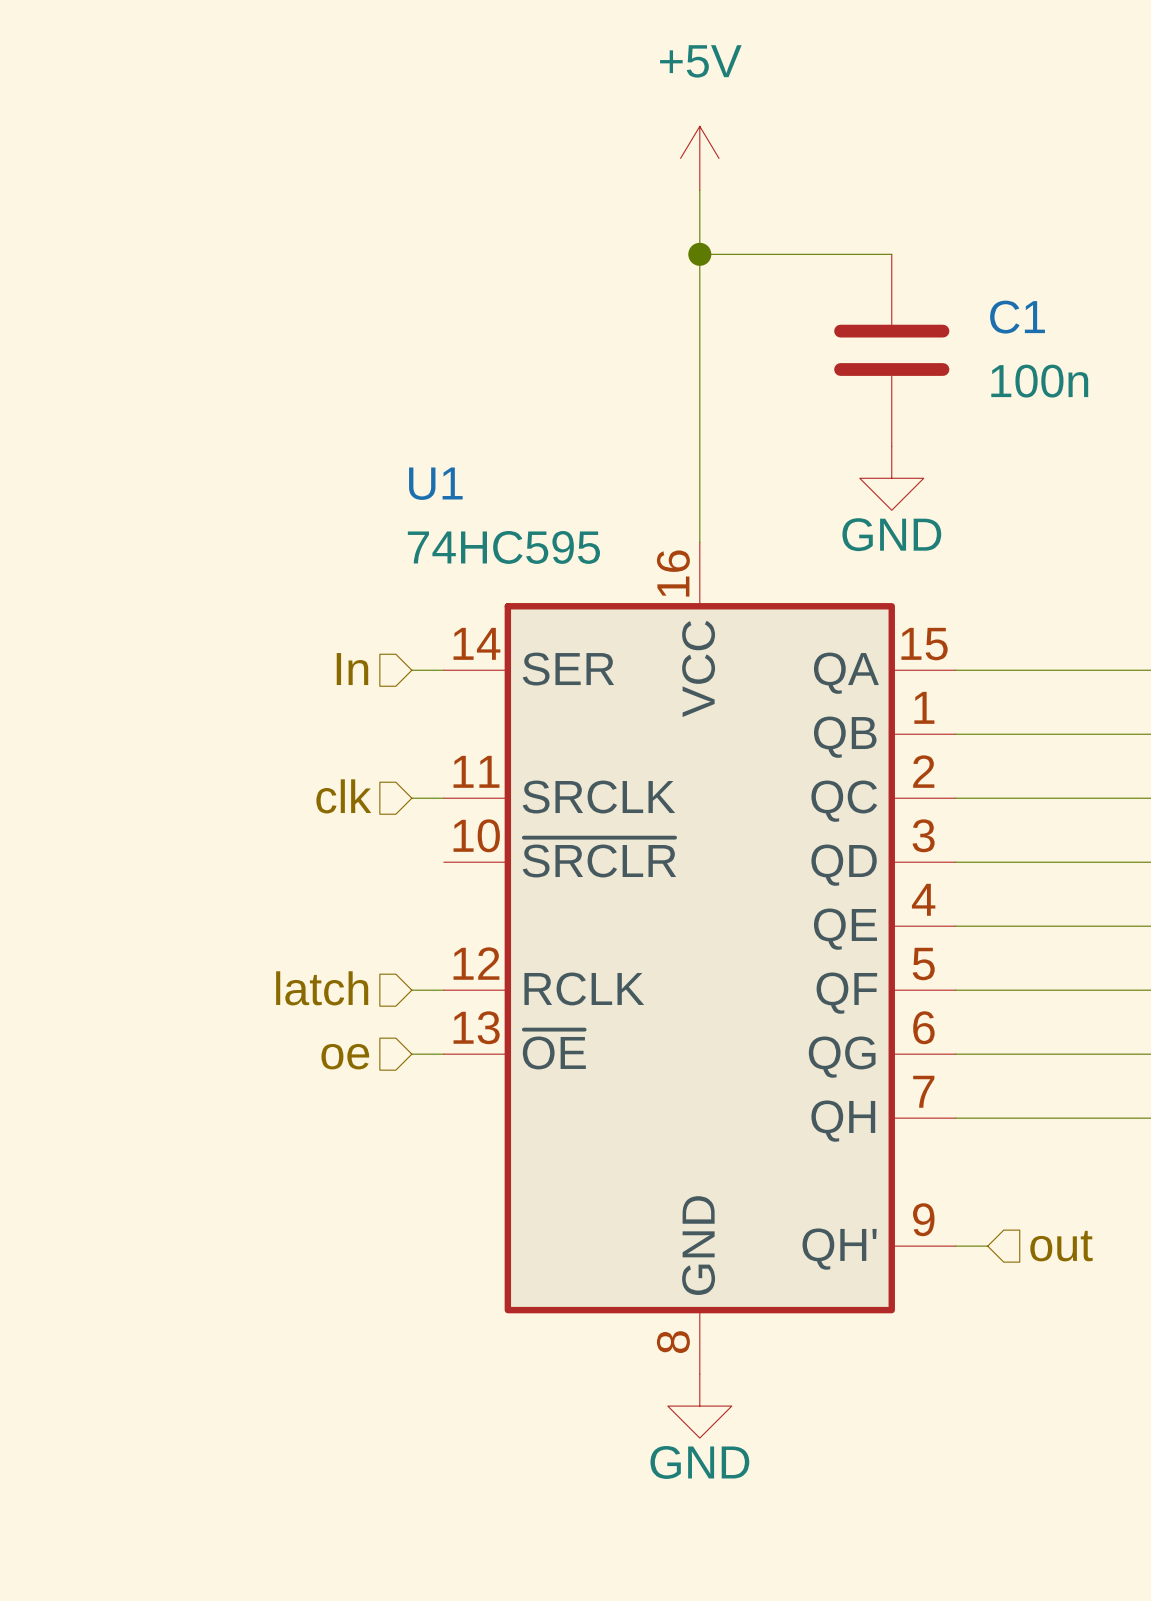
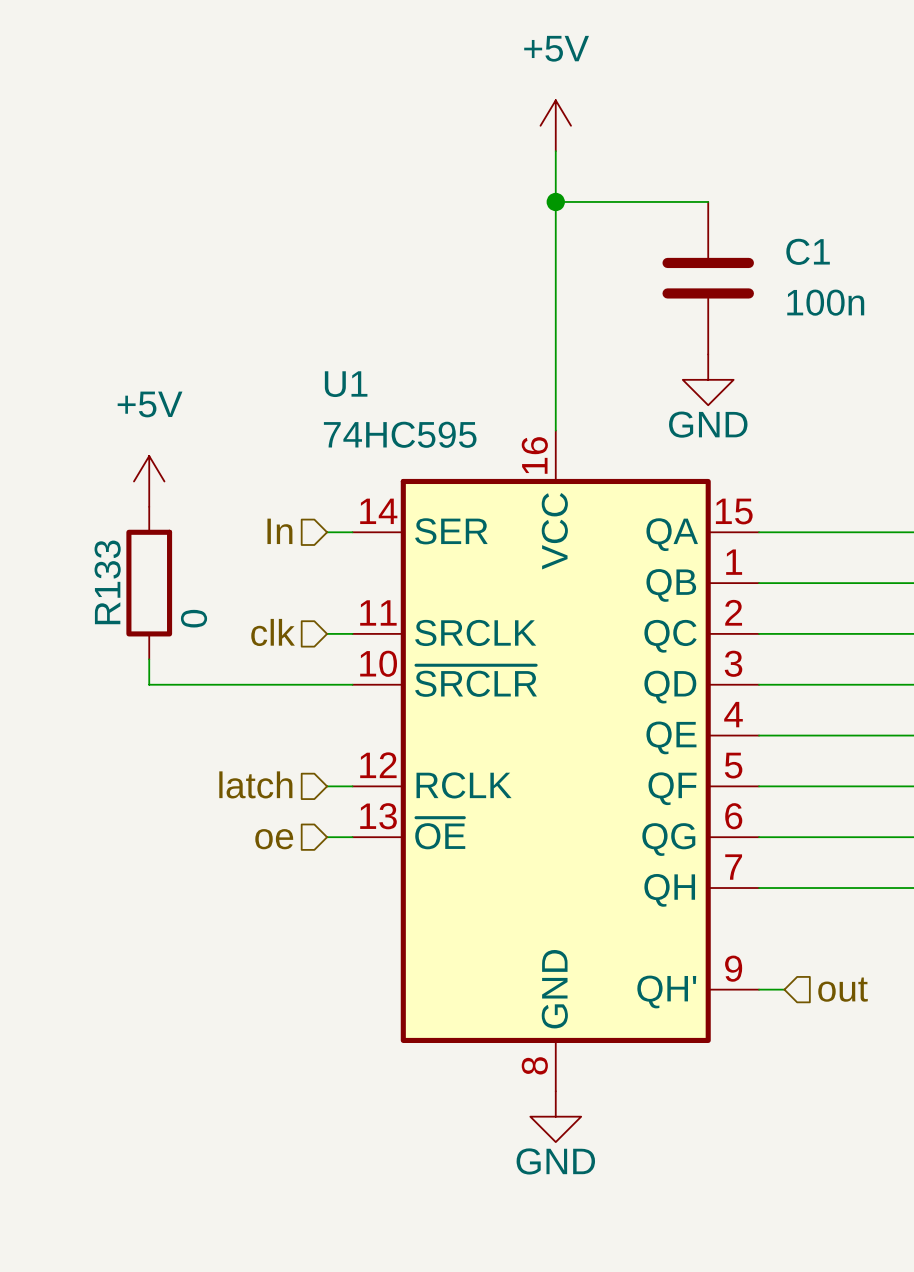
power symbol: none -> +5V (149, 481)
R133: none -> 0 (149, 583)
wire: none -> (149, 659) (149, 684) (352, 684)

